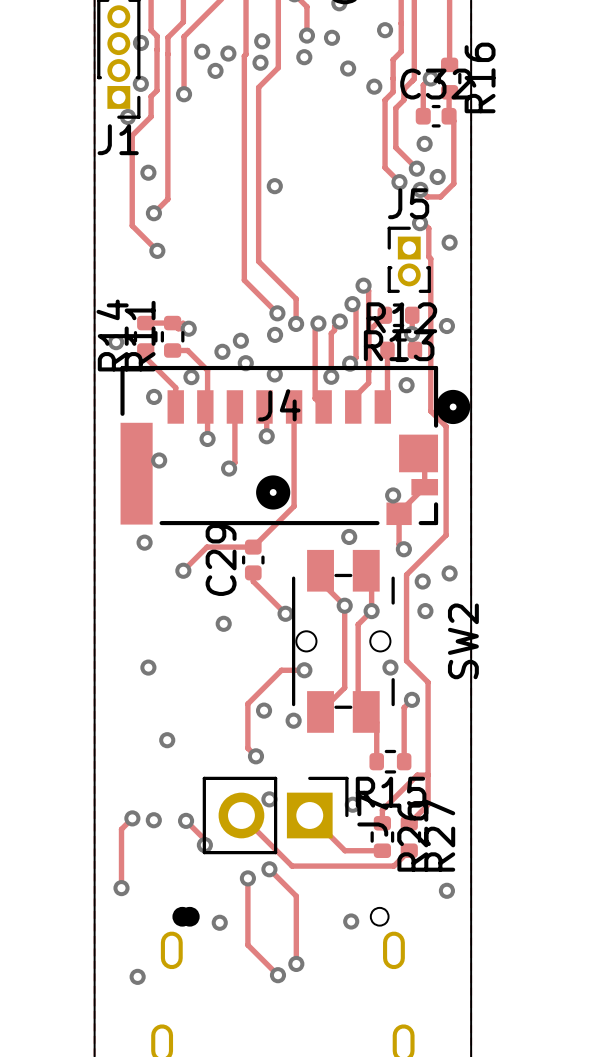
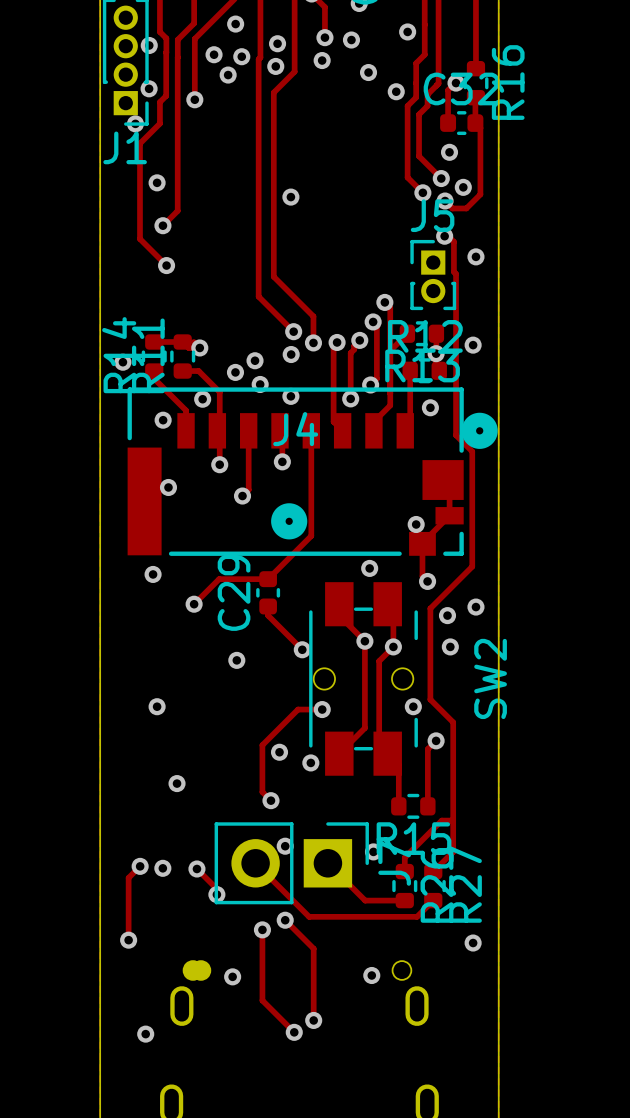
via: none -> (235, 24)

